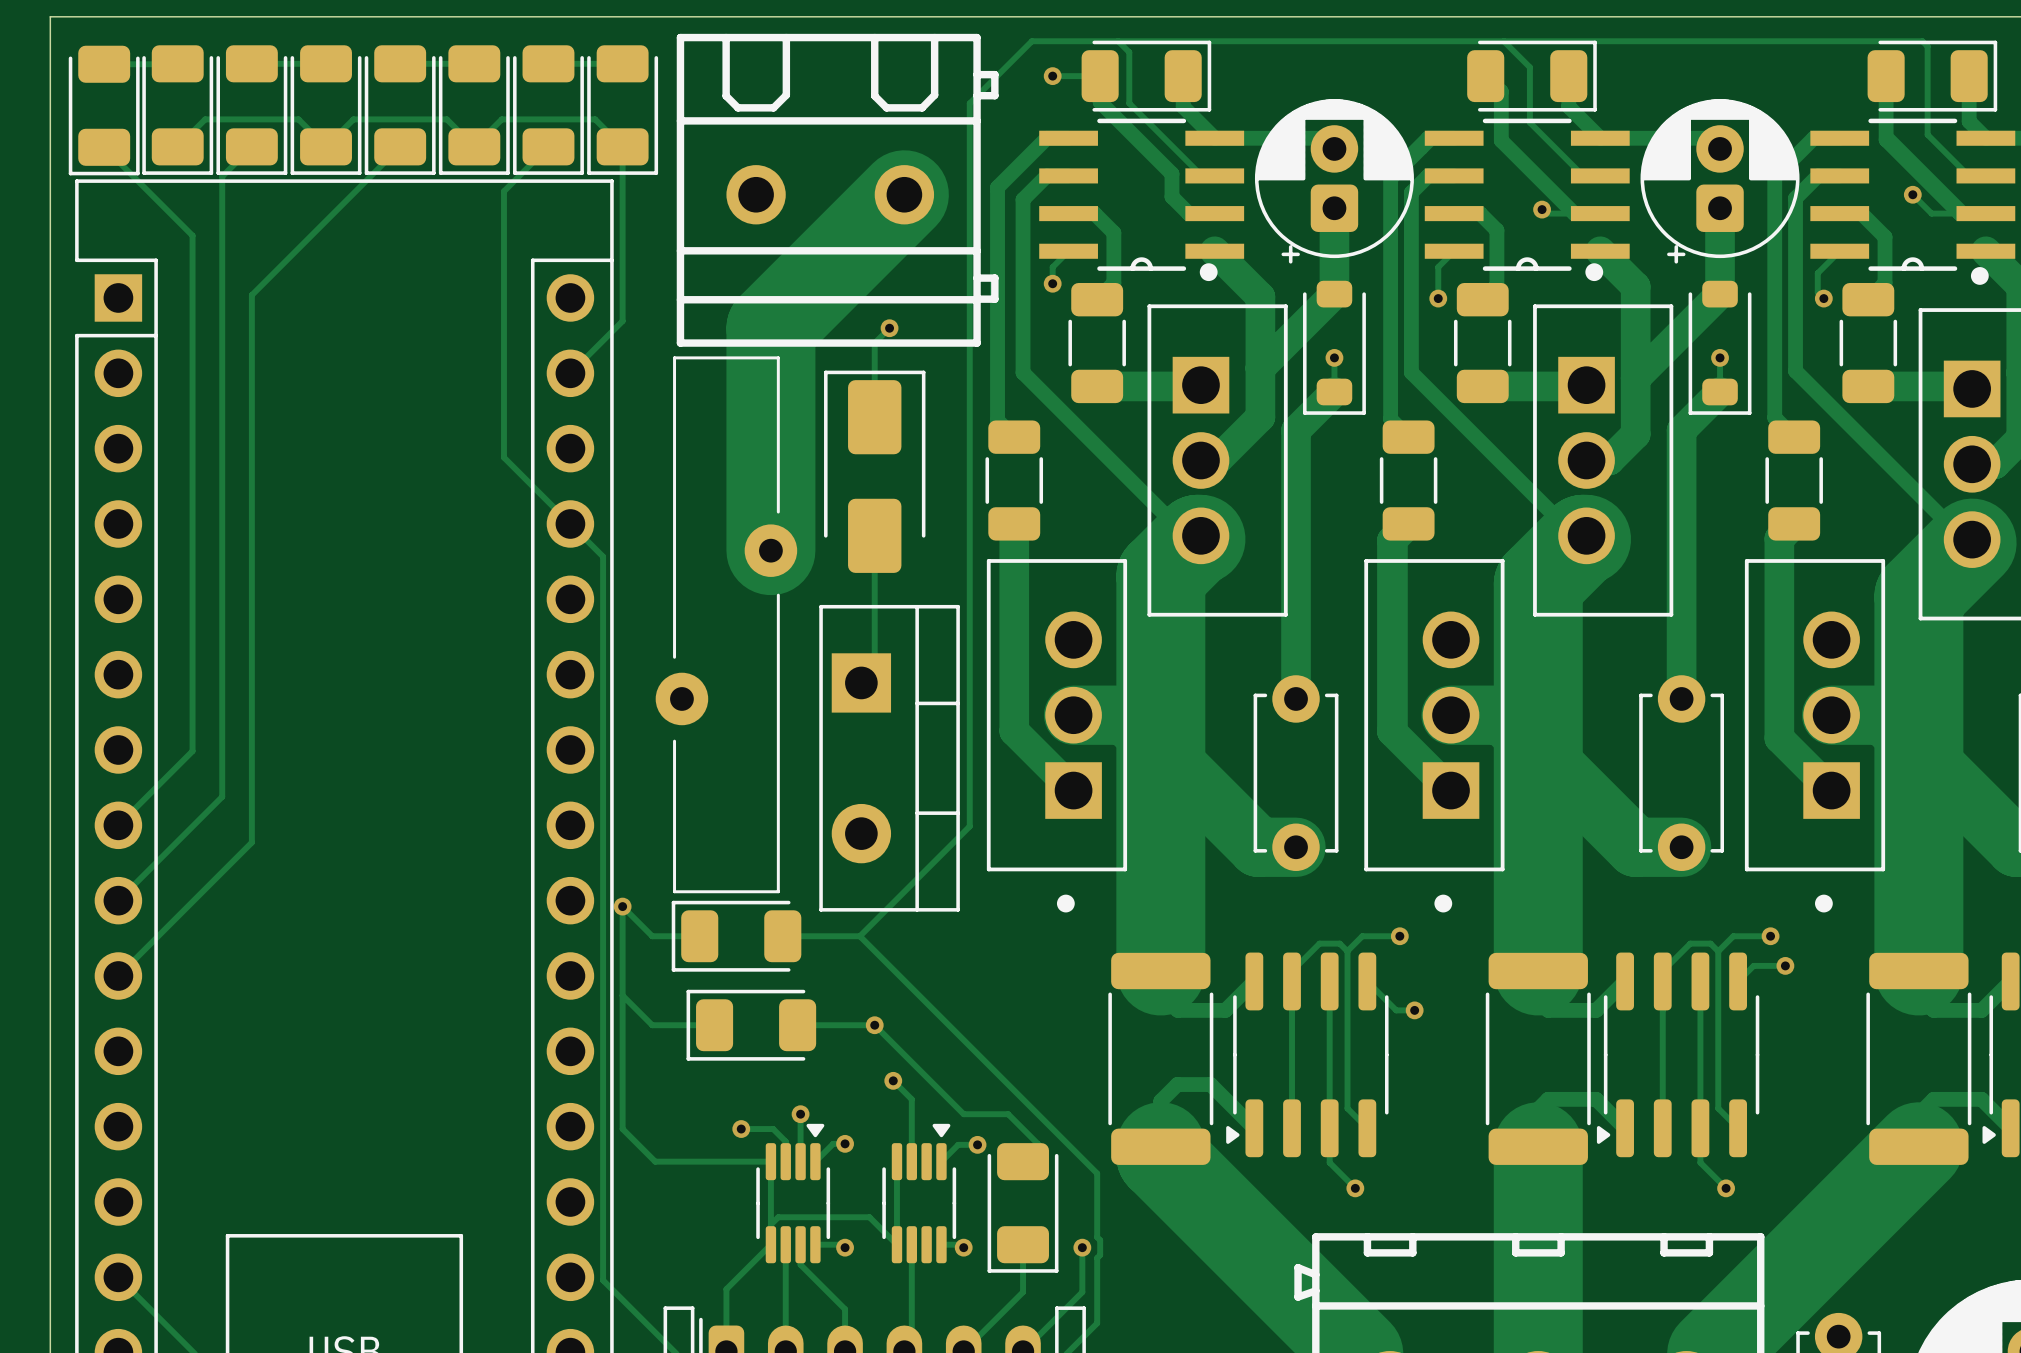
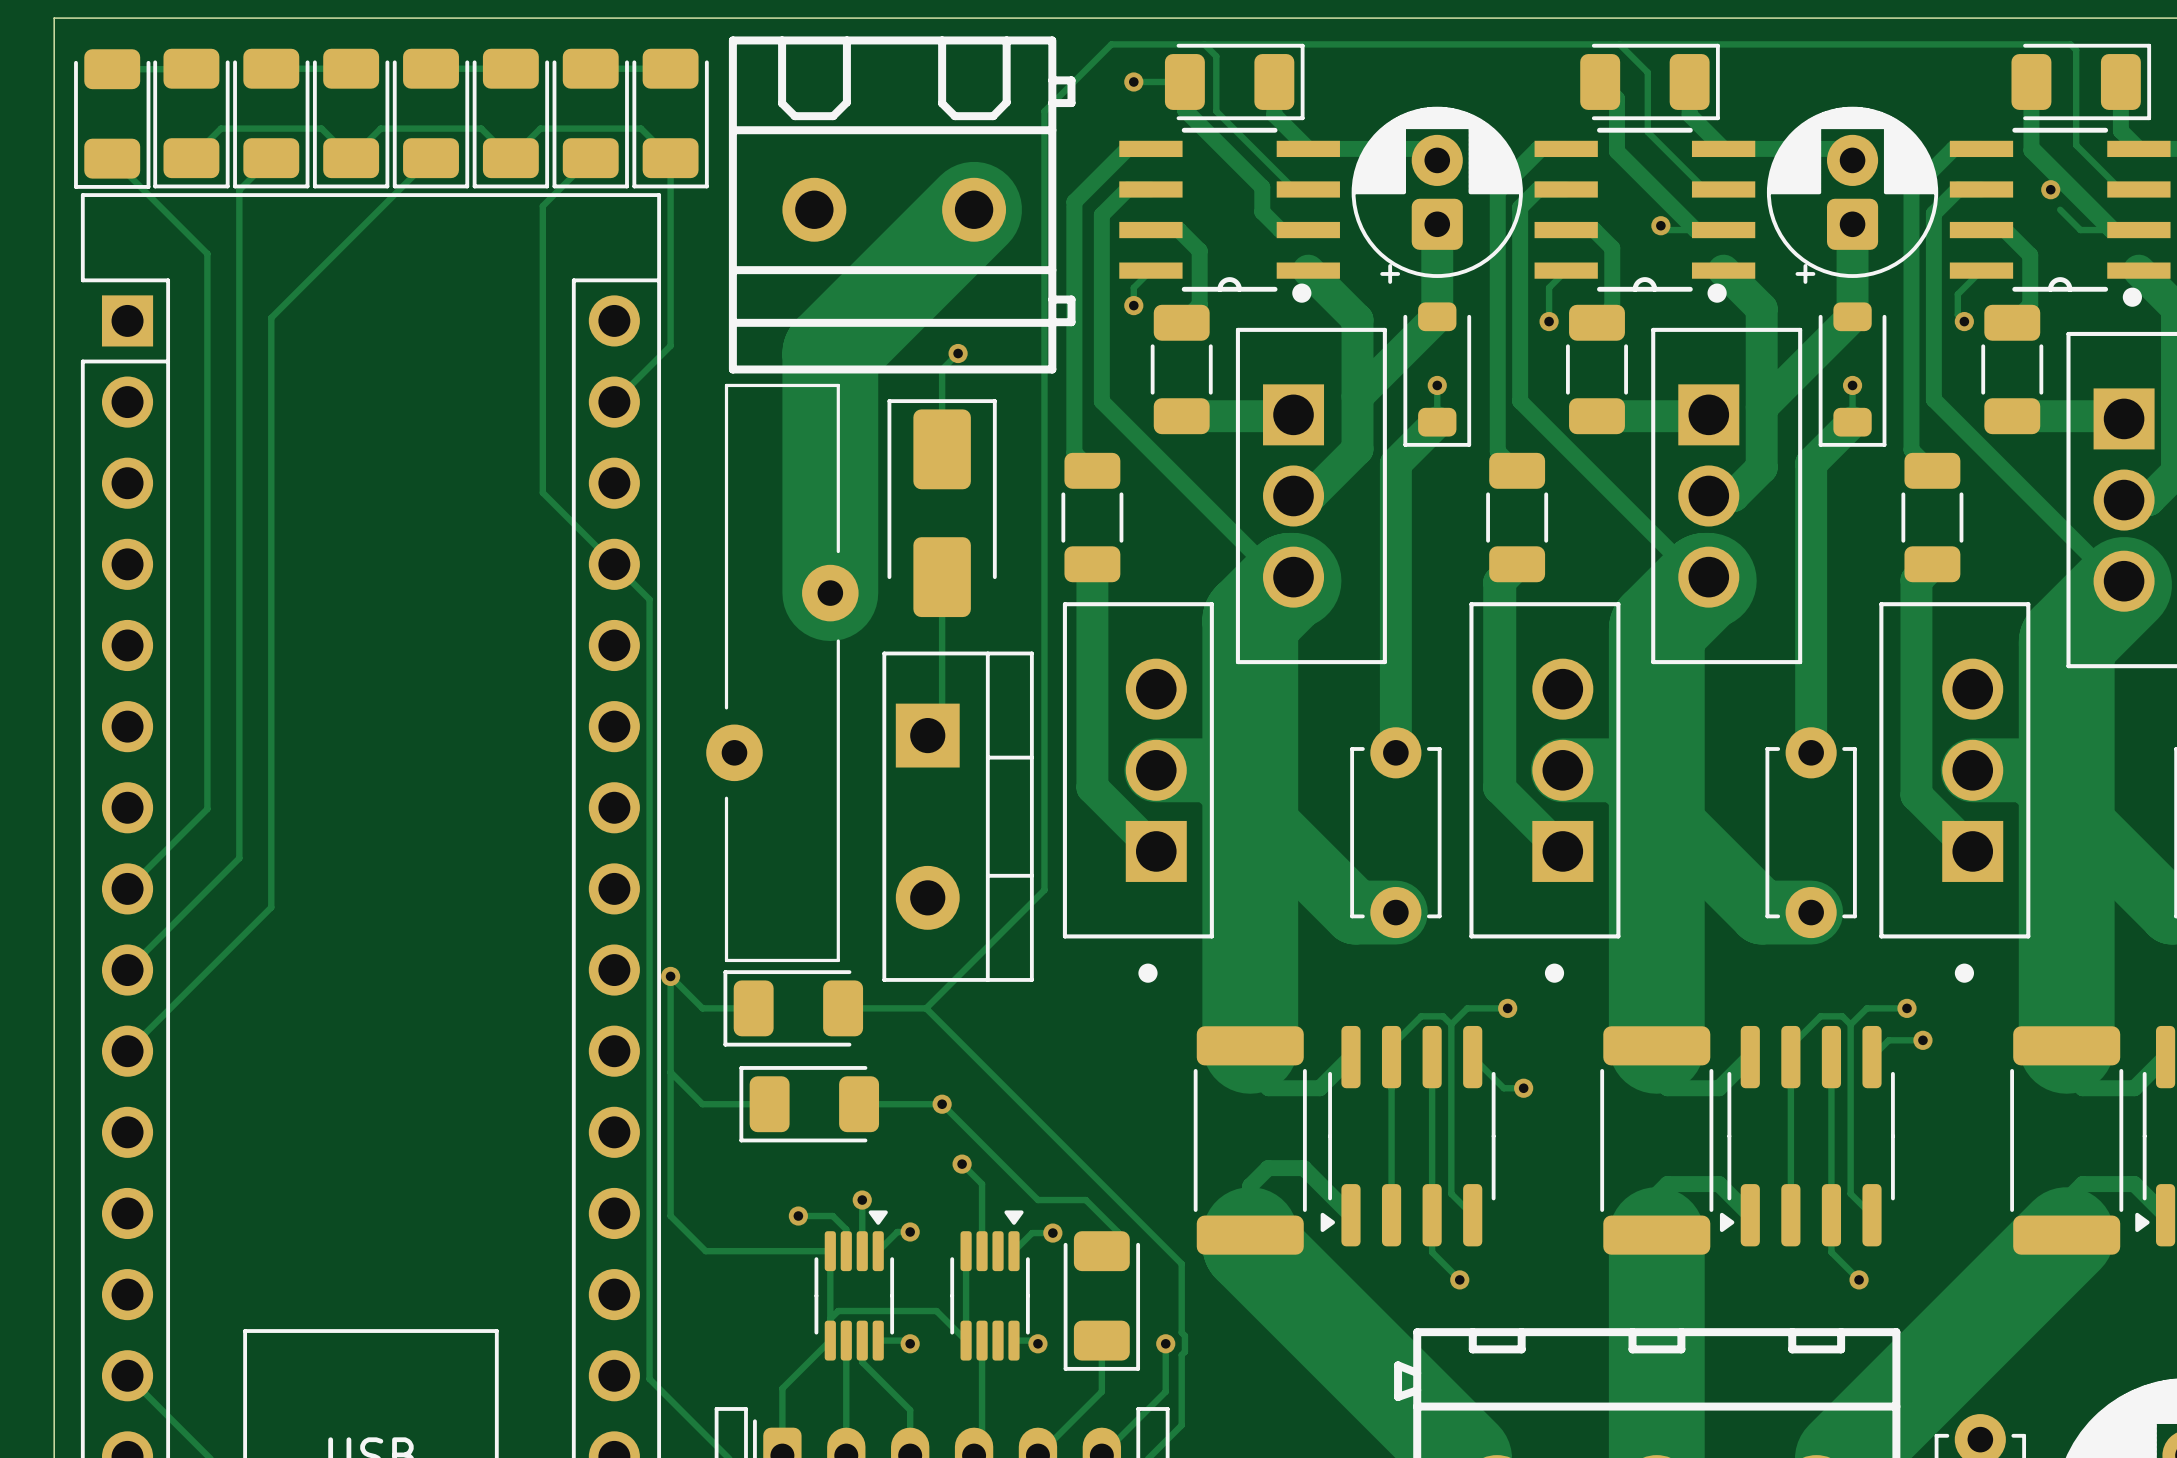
via position: (1912, 194) -> (2050, 189)

